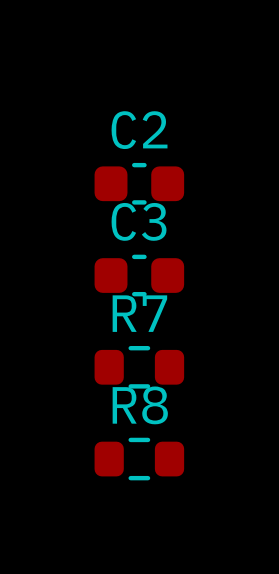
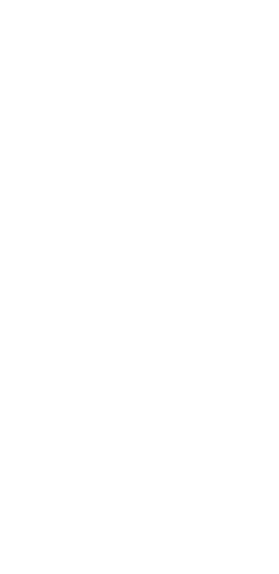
C2: (139, 183) -> none
C3: (139, 275) -> none
R7: (139, 367) -> none
R8: (139, 459) -> none

